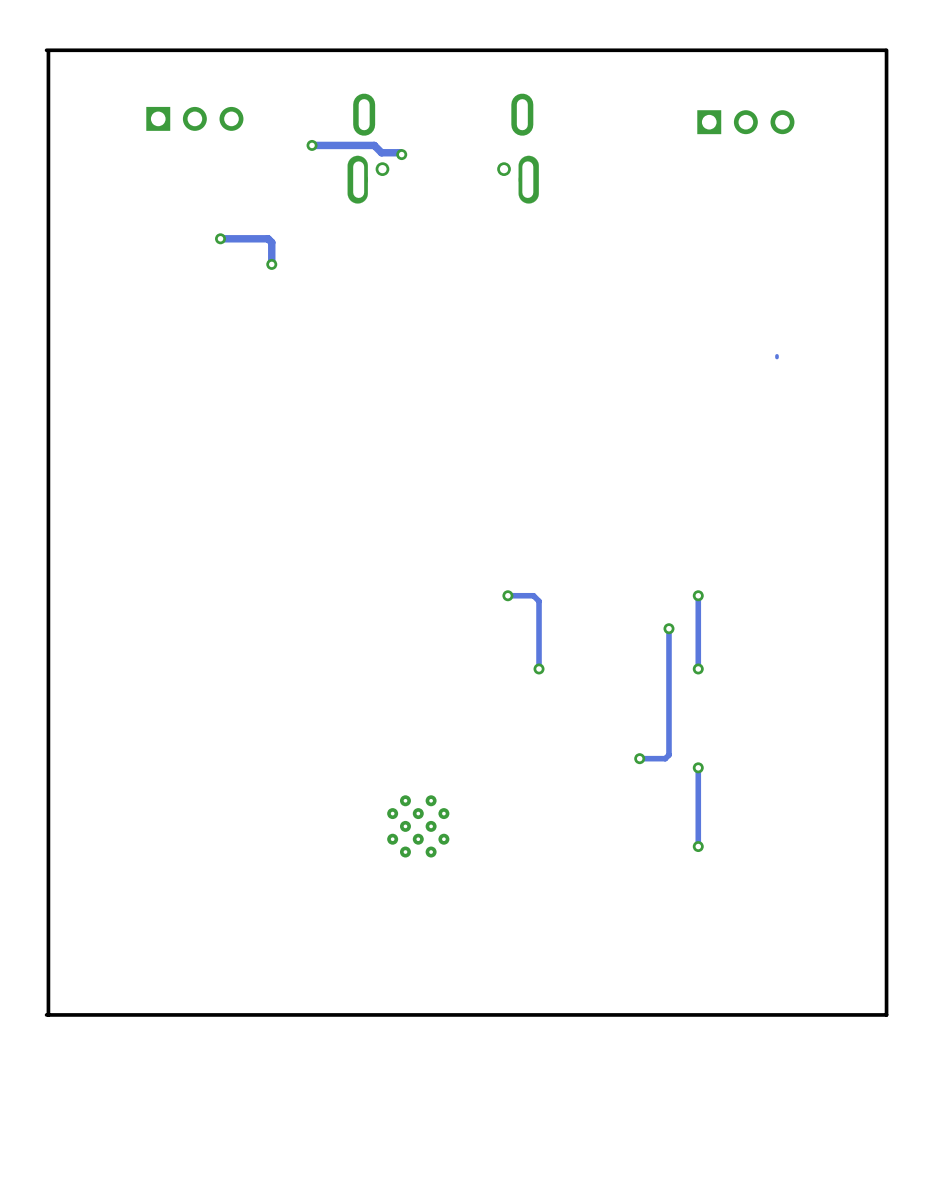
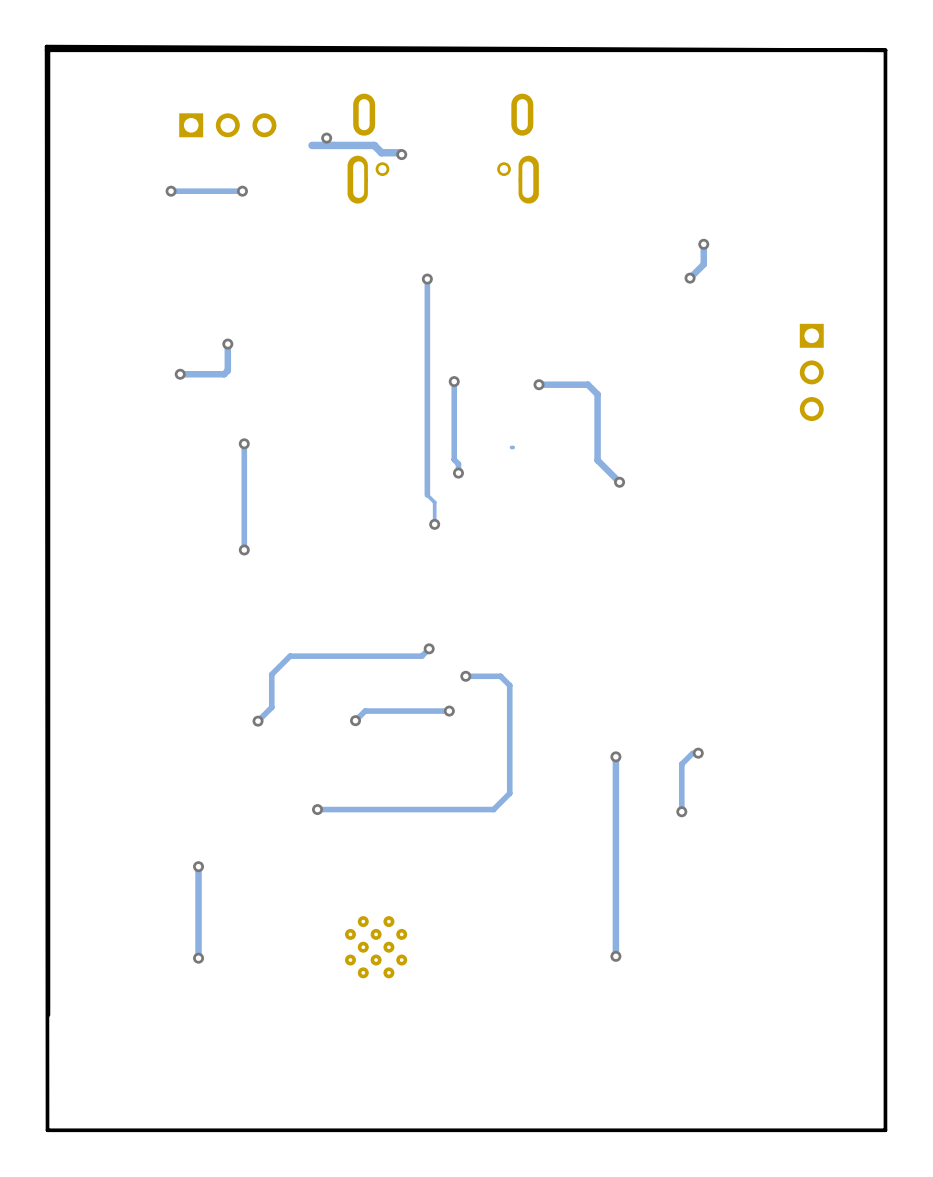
board edge: none -> (46, 46) (885, 50) (885, 1130) (47, 1130) (46, 46)
board edge: (886, 50) (886, 1014) (46, 1014) -> none
part position: (194, 118) -> (227, 125)
part rotation: 0° (745, 122) -> 90° clockwise (811, 372)
part position: (745, 122) -> (811, 372)
via position: (312, 145) -> (326, 138)
via: none -> (171, 191)
track: none -> (242, 191) (171, 191)
via: none -> (242, 191)
track: (220, 238) (268, 238) (271, 242) (271, 264) -> none
via: (220, 238) -> none
track: none -> (703, 244) (703, 264) (690, 278)
via: none -> (703, 244)
via: (271, 264) -> none
via: none -> (690, 278)
track: none -> (427, 279) (427, 495) (434, 502) (434, 524)
via: none -> (427, 279)
track: none -> (227, 344) (227, 370) (224, 374) (180, 374)
via: none -> (227, 344)
track: (776, 355) (776, 357) -> none
via: none -> (180, 374)
track: none -> (454, 381) (454, 459) (458, 463) (458, 473)
via: none -> (454, 381)
track: none -> (539, 384) (587, 384) (597, 394) (597, 460) (619, 482)
via: none -> (539, 384)
track: none -> (244, 443) (244, 549)
via: none -> (244, 443)
track: none -> (513, 447) (511, 447)
via: none -> (458, 473)
via: none -> (619, 482)
via: none -> (434, 524)
via: none -> (244, 549)
track: (507, 595) (533, 595) (539, 601) (539, 668) -> none
via: (507, 595) -> none
track: (698, 595) (698, 668) -> none
via: (698, 595) -> none
track: (668, 628) (668, 755) (665, 758) (639, 758) -> none
via: (668, 628) -> none
track: none -> (429, 648) (421, 656) (290, 656) (271, 674) (271, 707) (258, 721)
via: none -> (429, 648)
via: (539, 668) -> none
via: (698, 668) -> none
track: none -> (465, 676) (500, 676) (509, 685) (509, 793) (493, 809) (317, 809)
via: none -> (465, 676)
track: none -> (449, 711) (365, 711) (355, 720)
via: none -> (449, 711)
via: none -> (355, 720)
via: none -> (258, 721)
track: none -> (698, 753) (692, 753) (681, 764) (681, 811)
track: none -> (615, 756) (615, 956)
via position: (639, 758) -> (615, 756)
track: (698, 767) (698, 846) -> none
via position: (698, 767) -> (698, 753)
via: none -> (317, 809)
via: none -> (681, 811)
part position: (418, 826) -> (376, 947)
via: (698, 846) -> none
track: none -> (198, 866) (198, 958)
via: none -> (198, 866)
via: none -> (615, 956)
via: none -> (198, 958)

